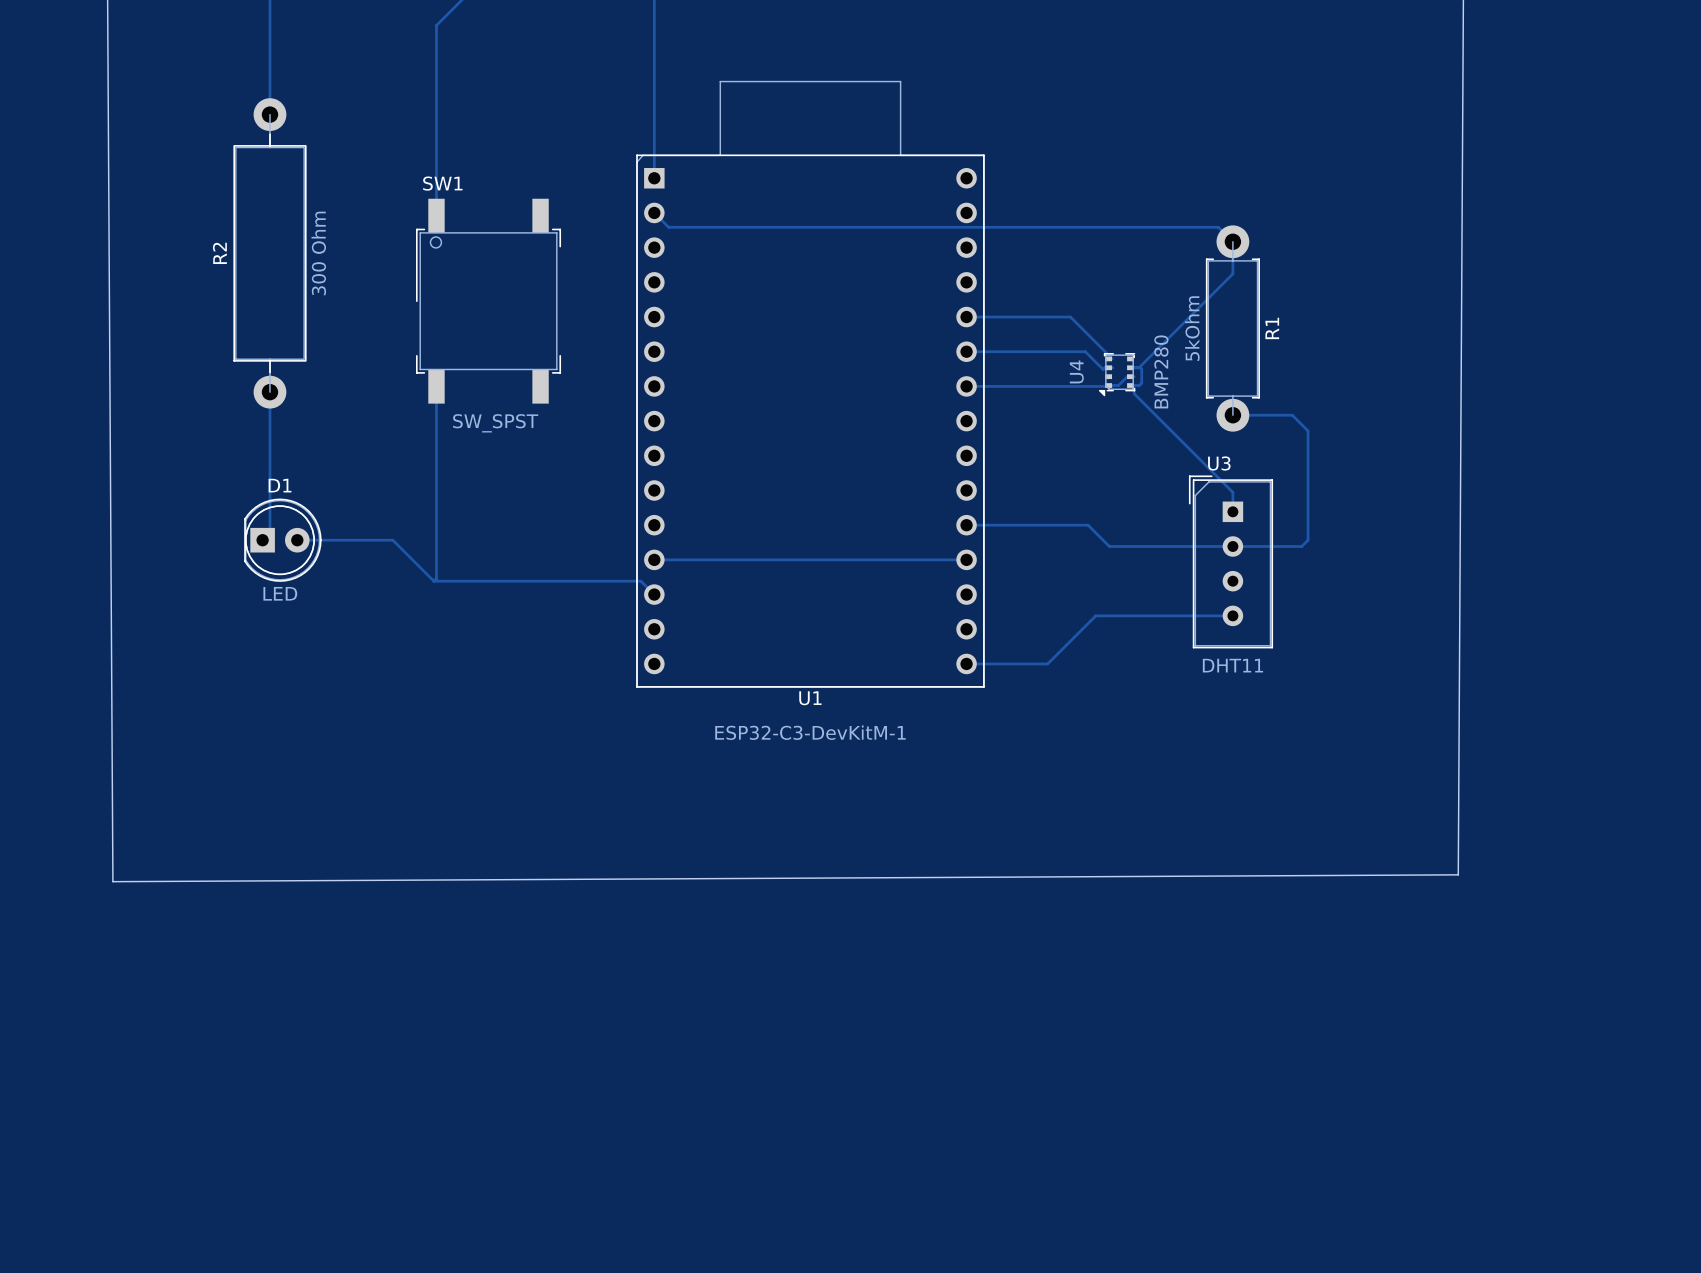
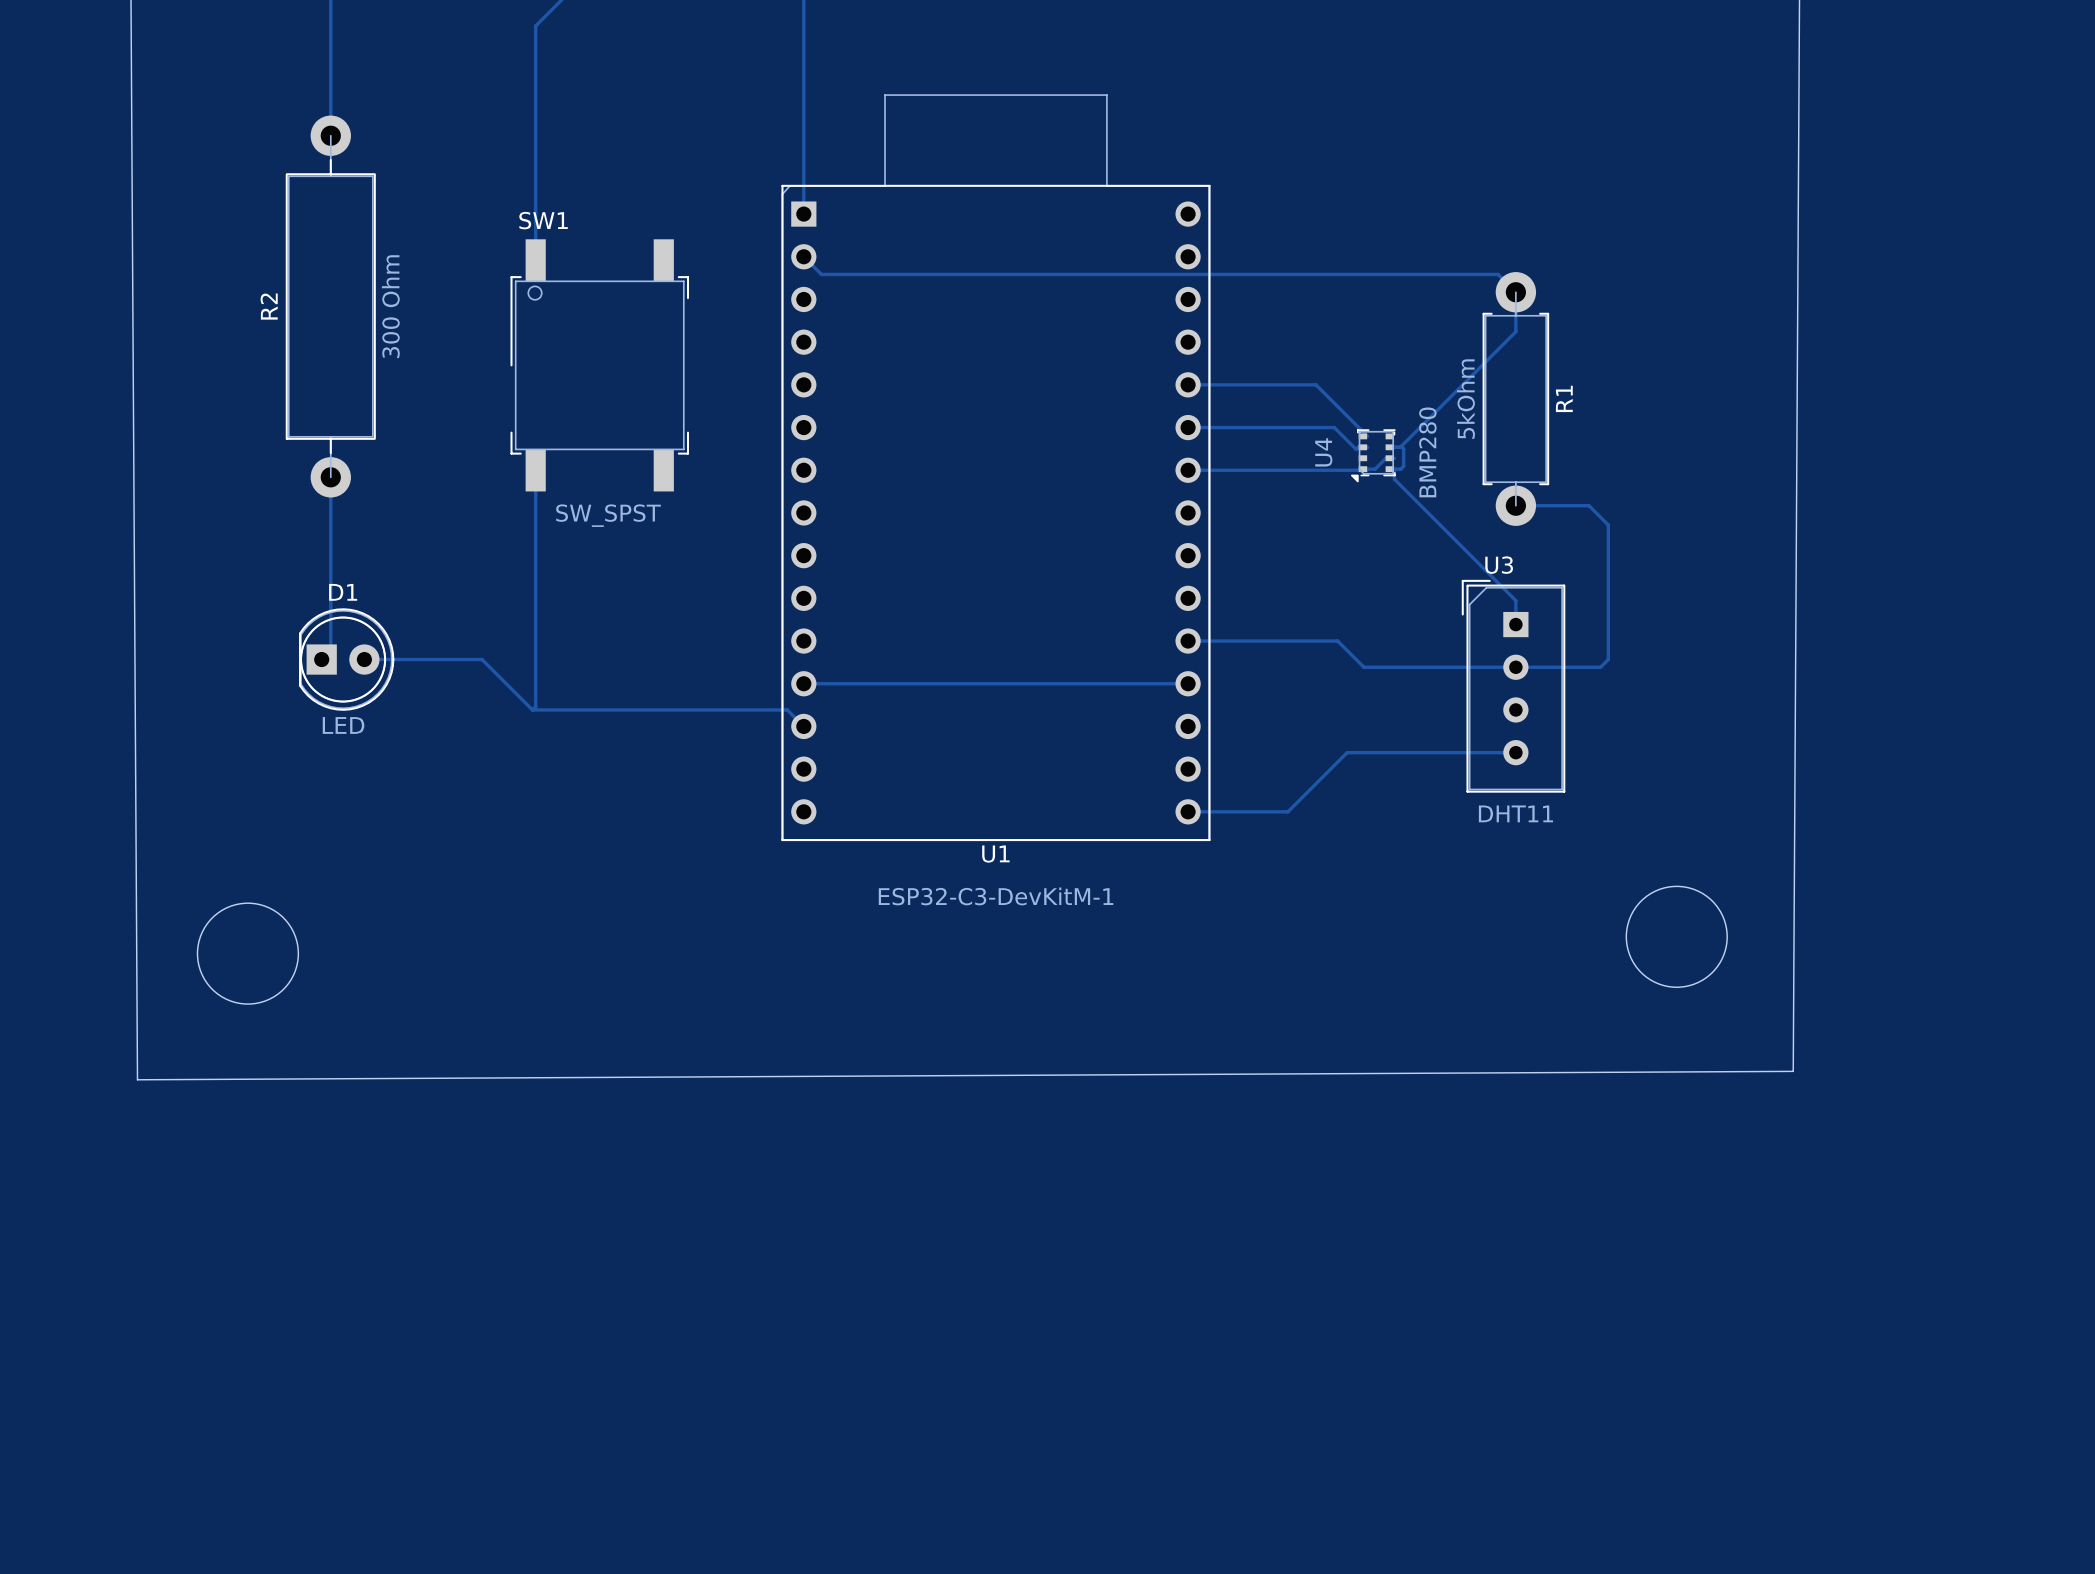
round board edge: none -> [1625, 885, 1728, 988]
round board edge: none -> [197, 902, 299, 1005]

